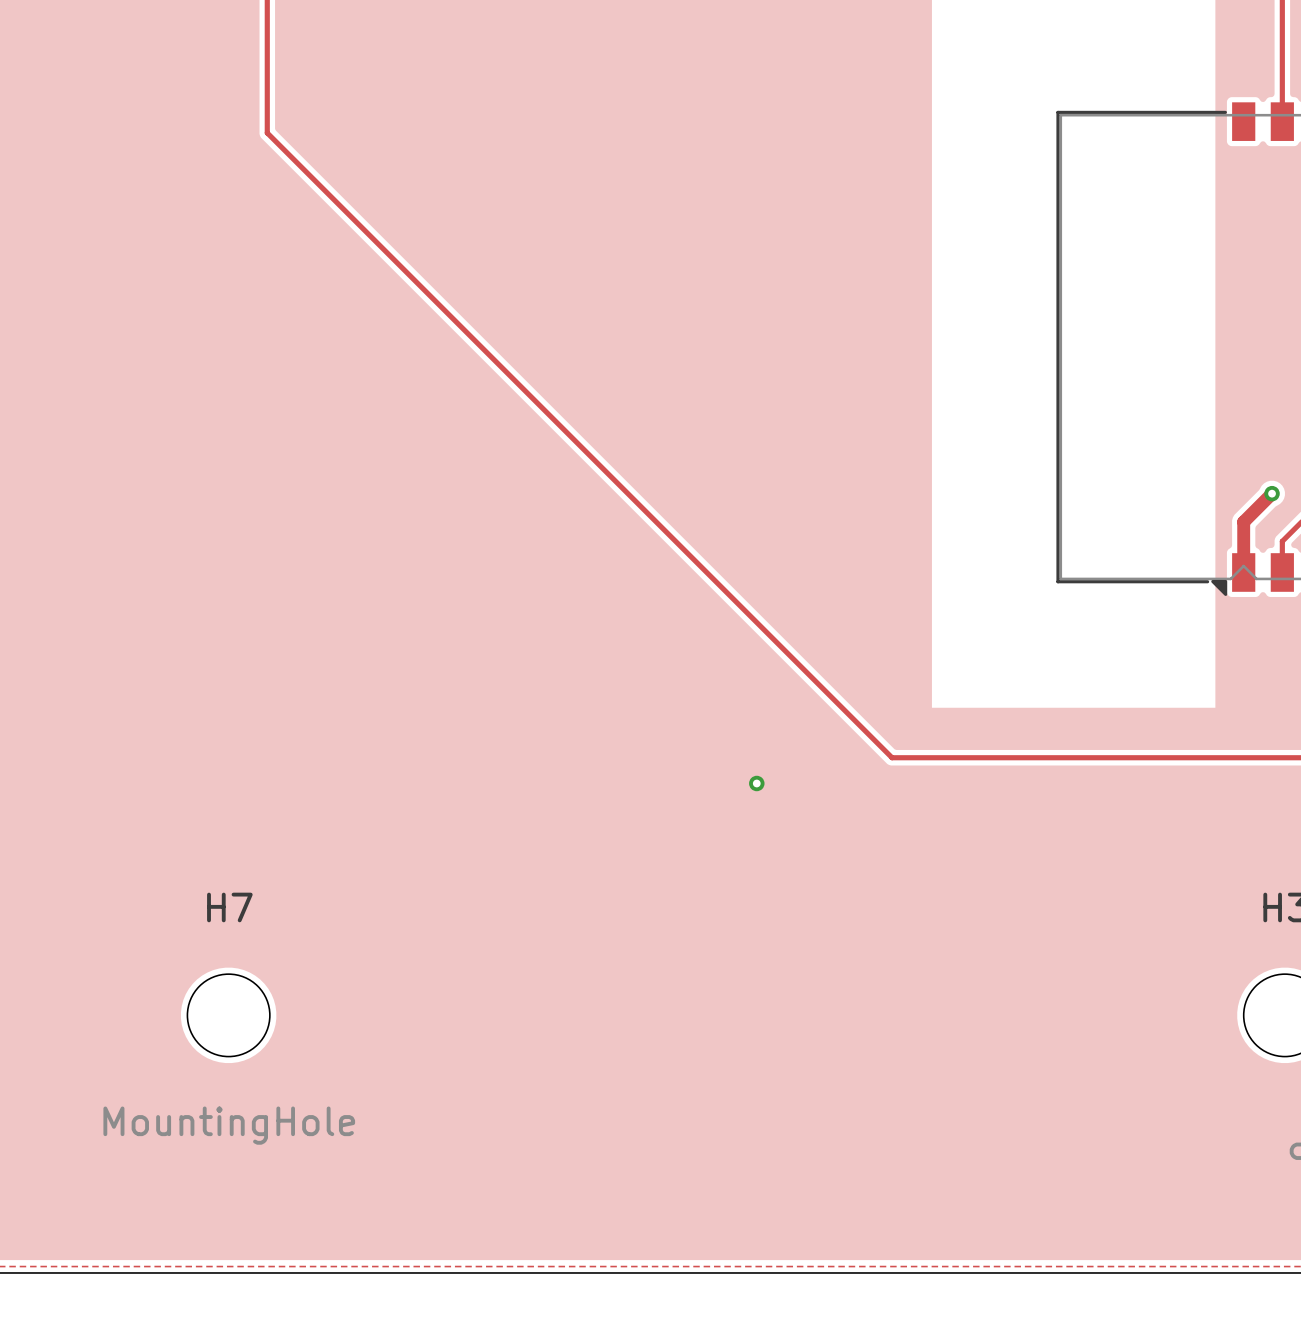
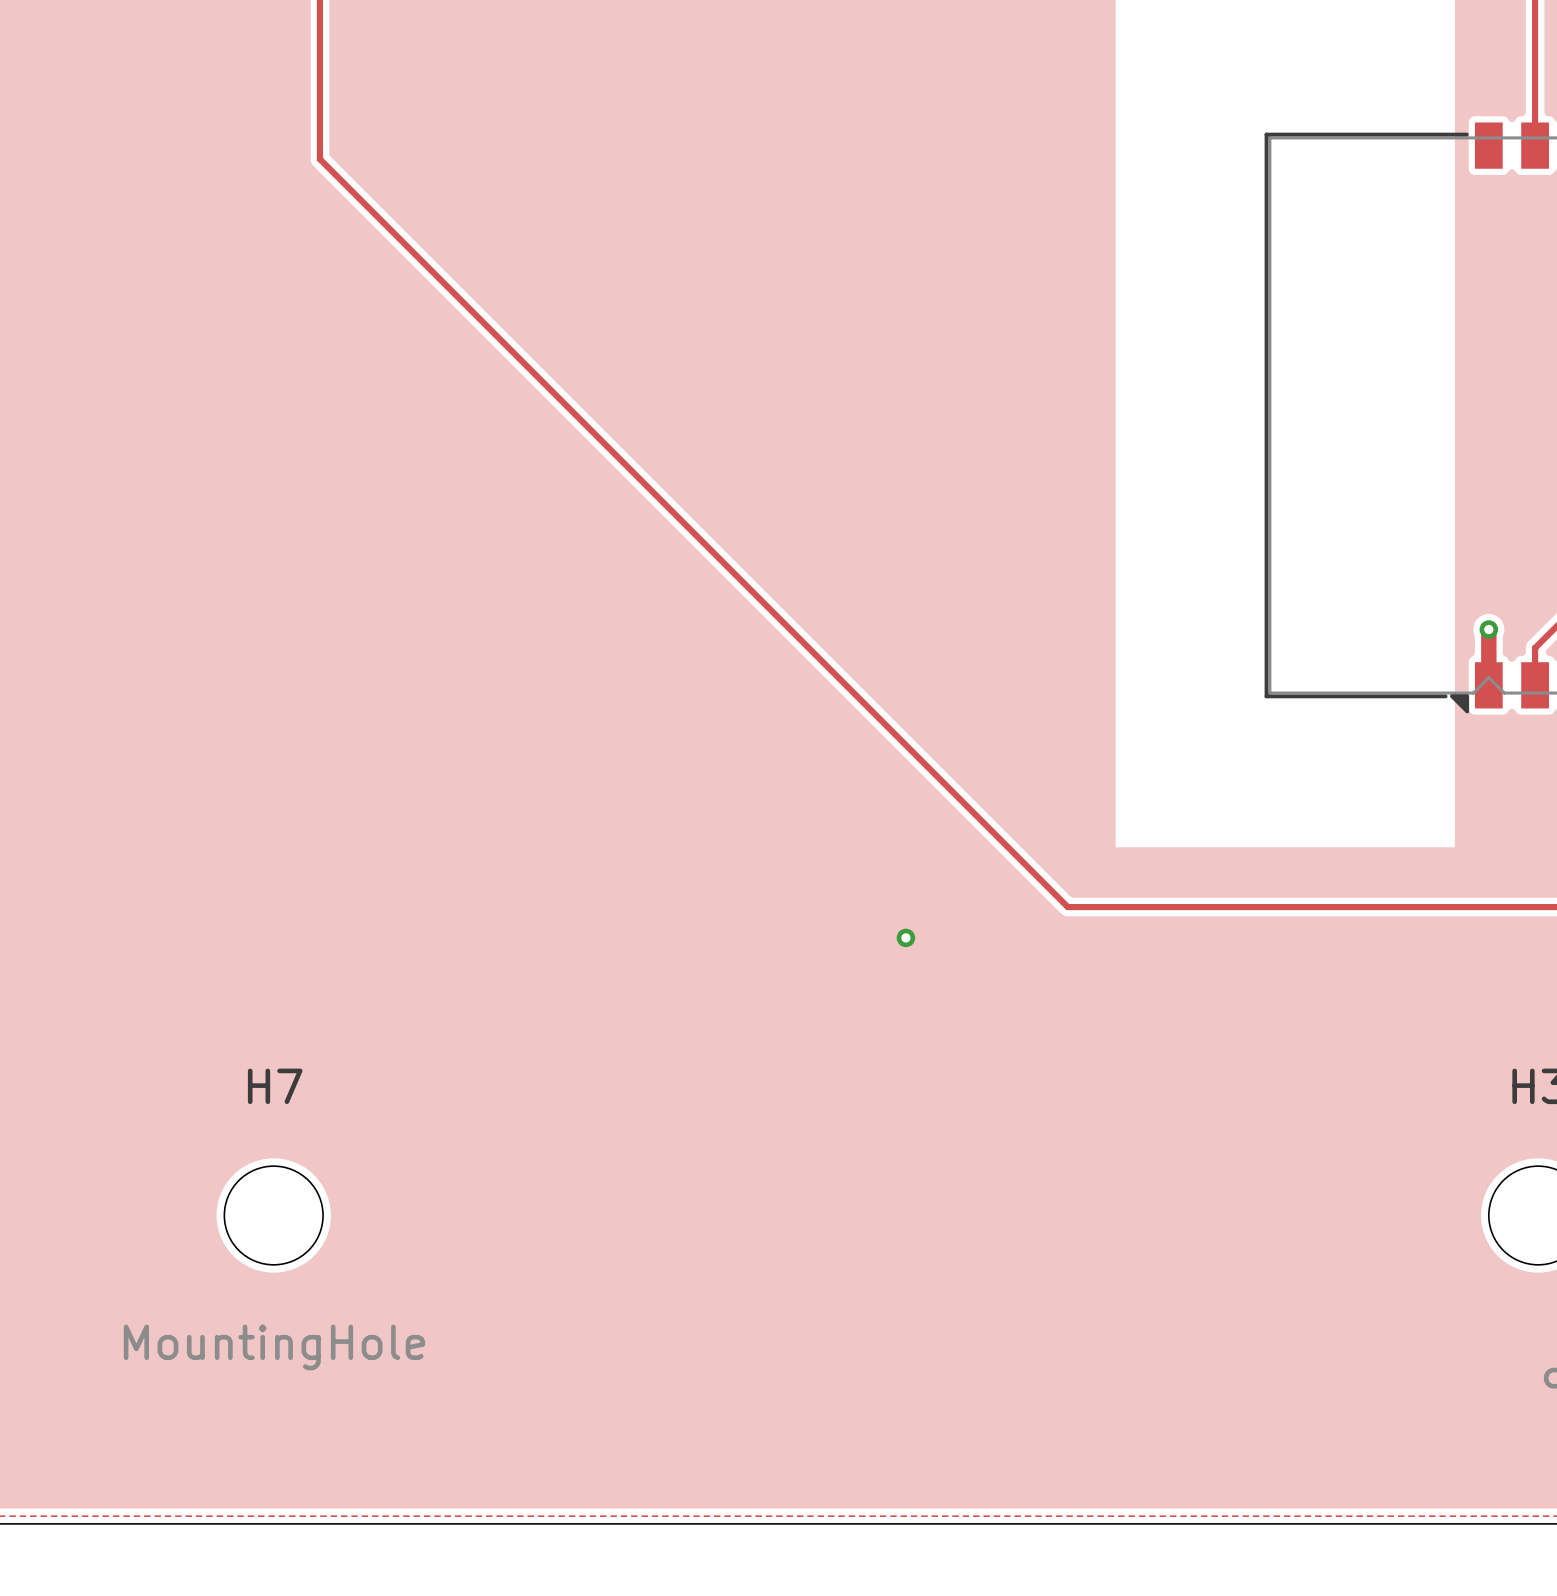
track: (1272, 493) (1243, 522) (1243, 525) -> none
via position: (1272, 493) -> (1488, 629)

